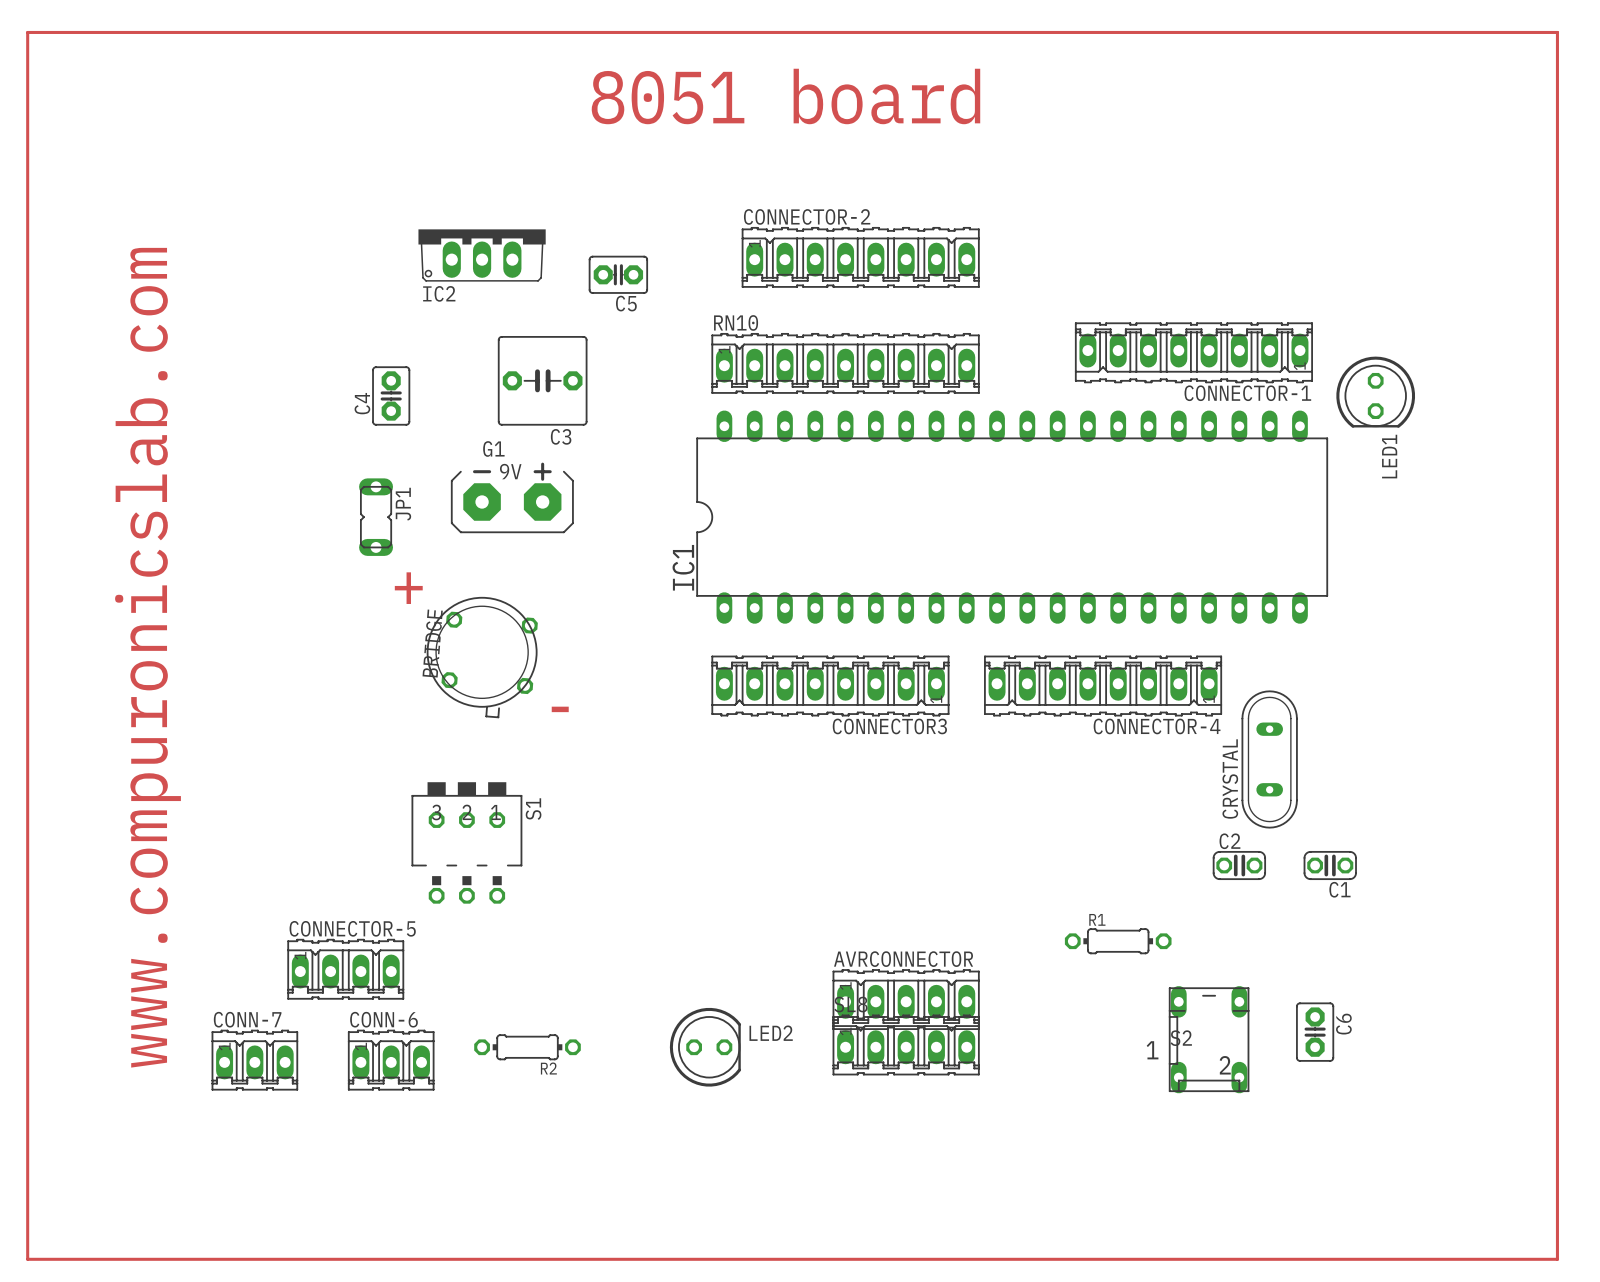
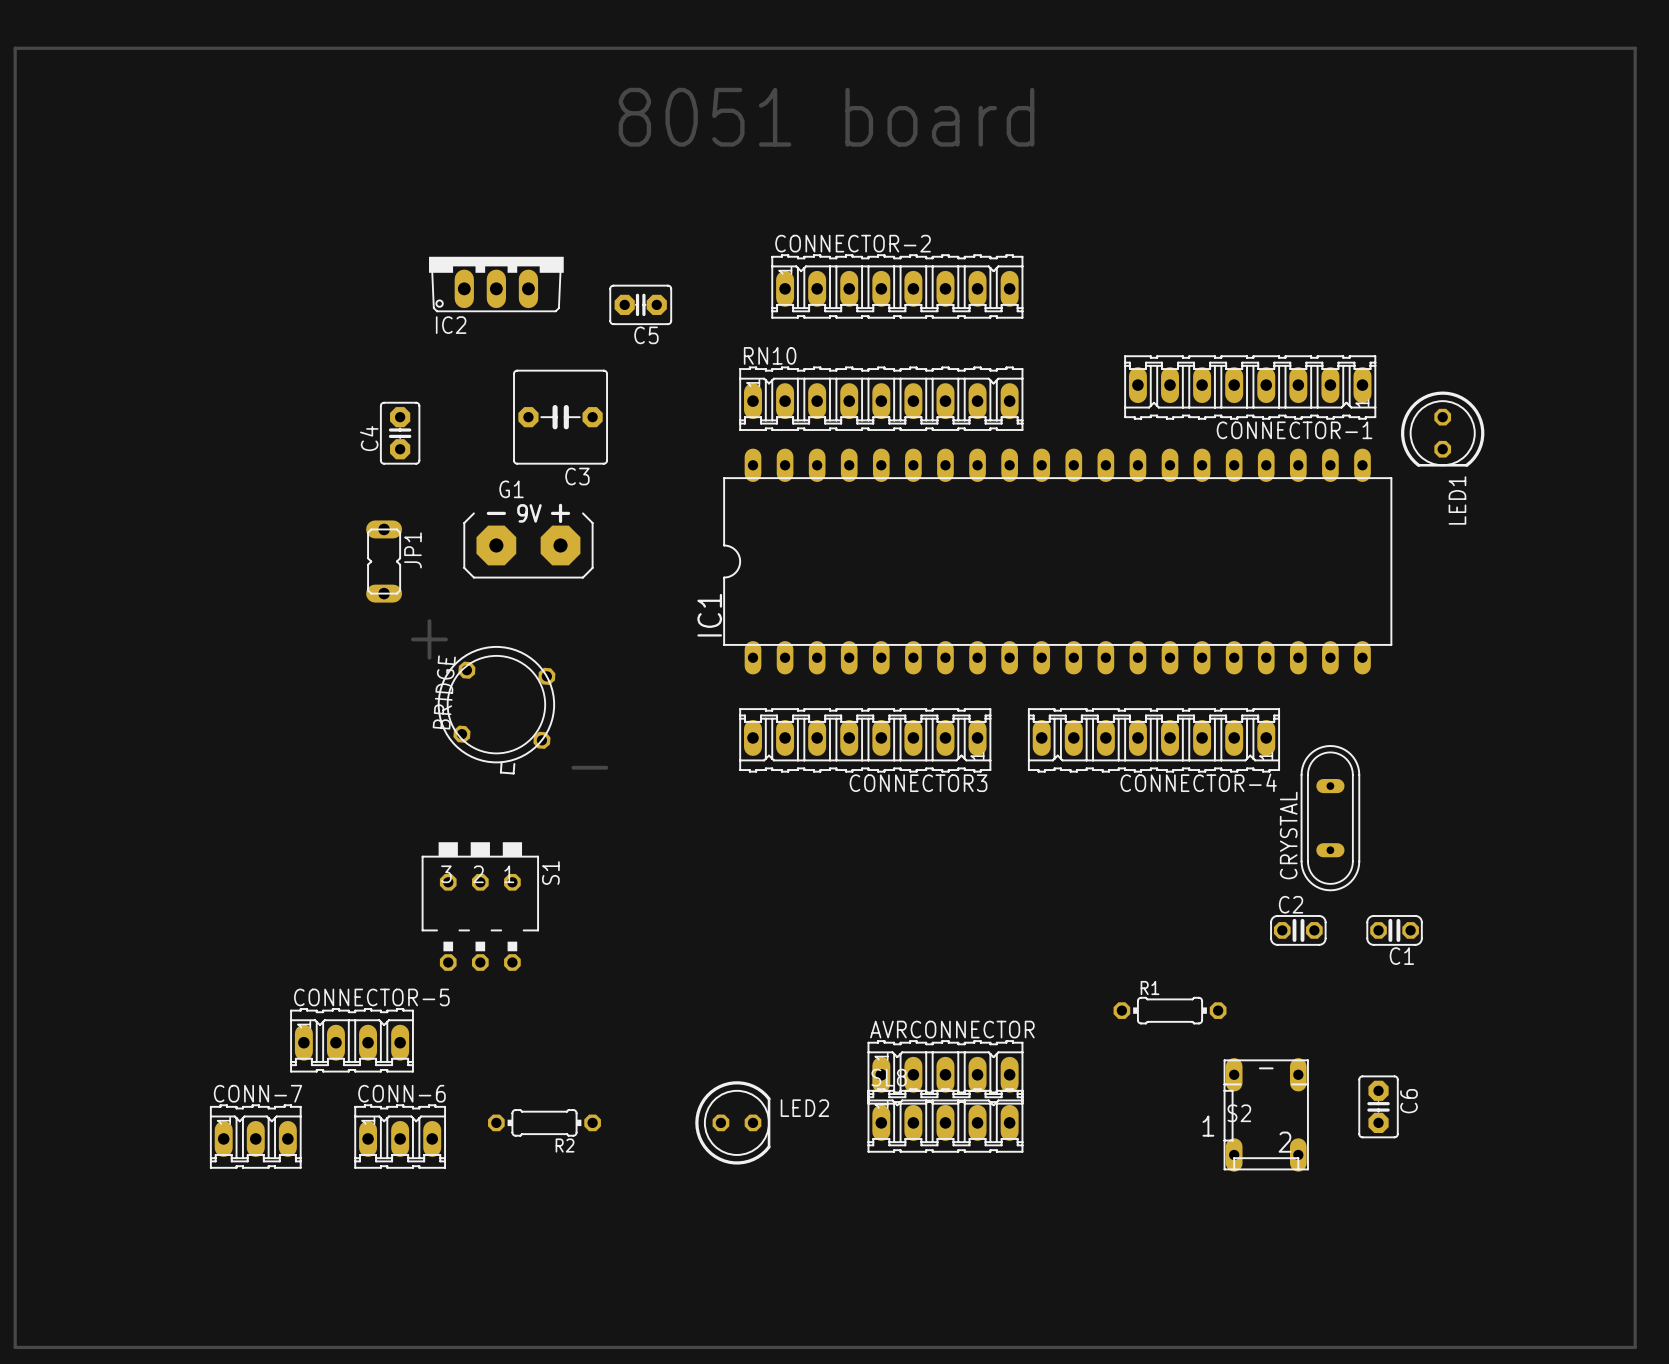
text: www.compuronicslab.com (148, 657) -> none

